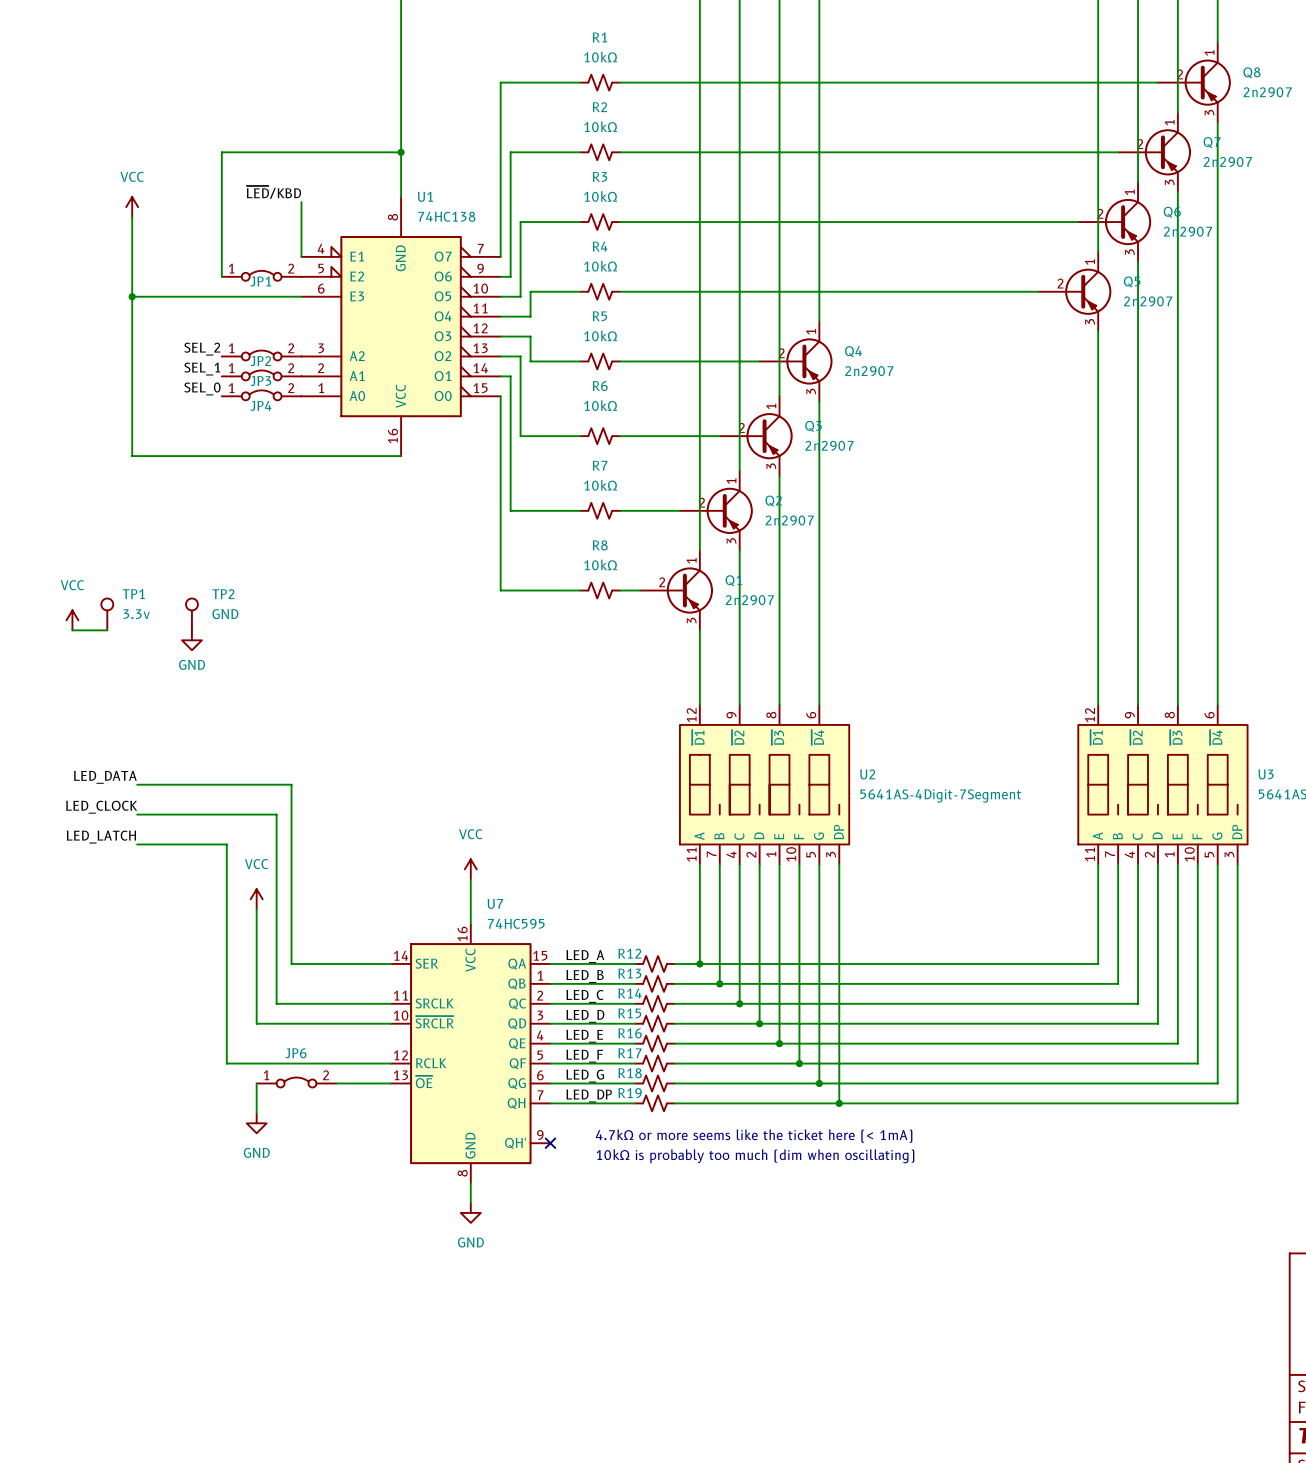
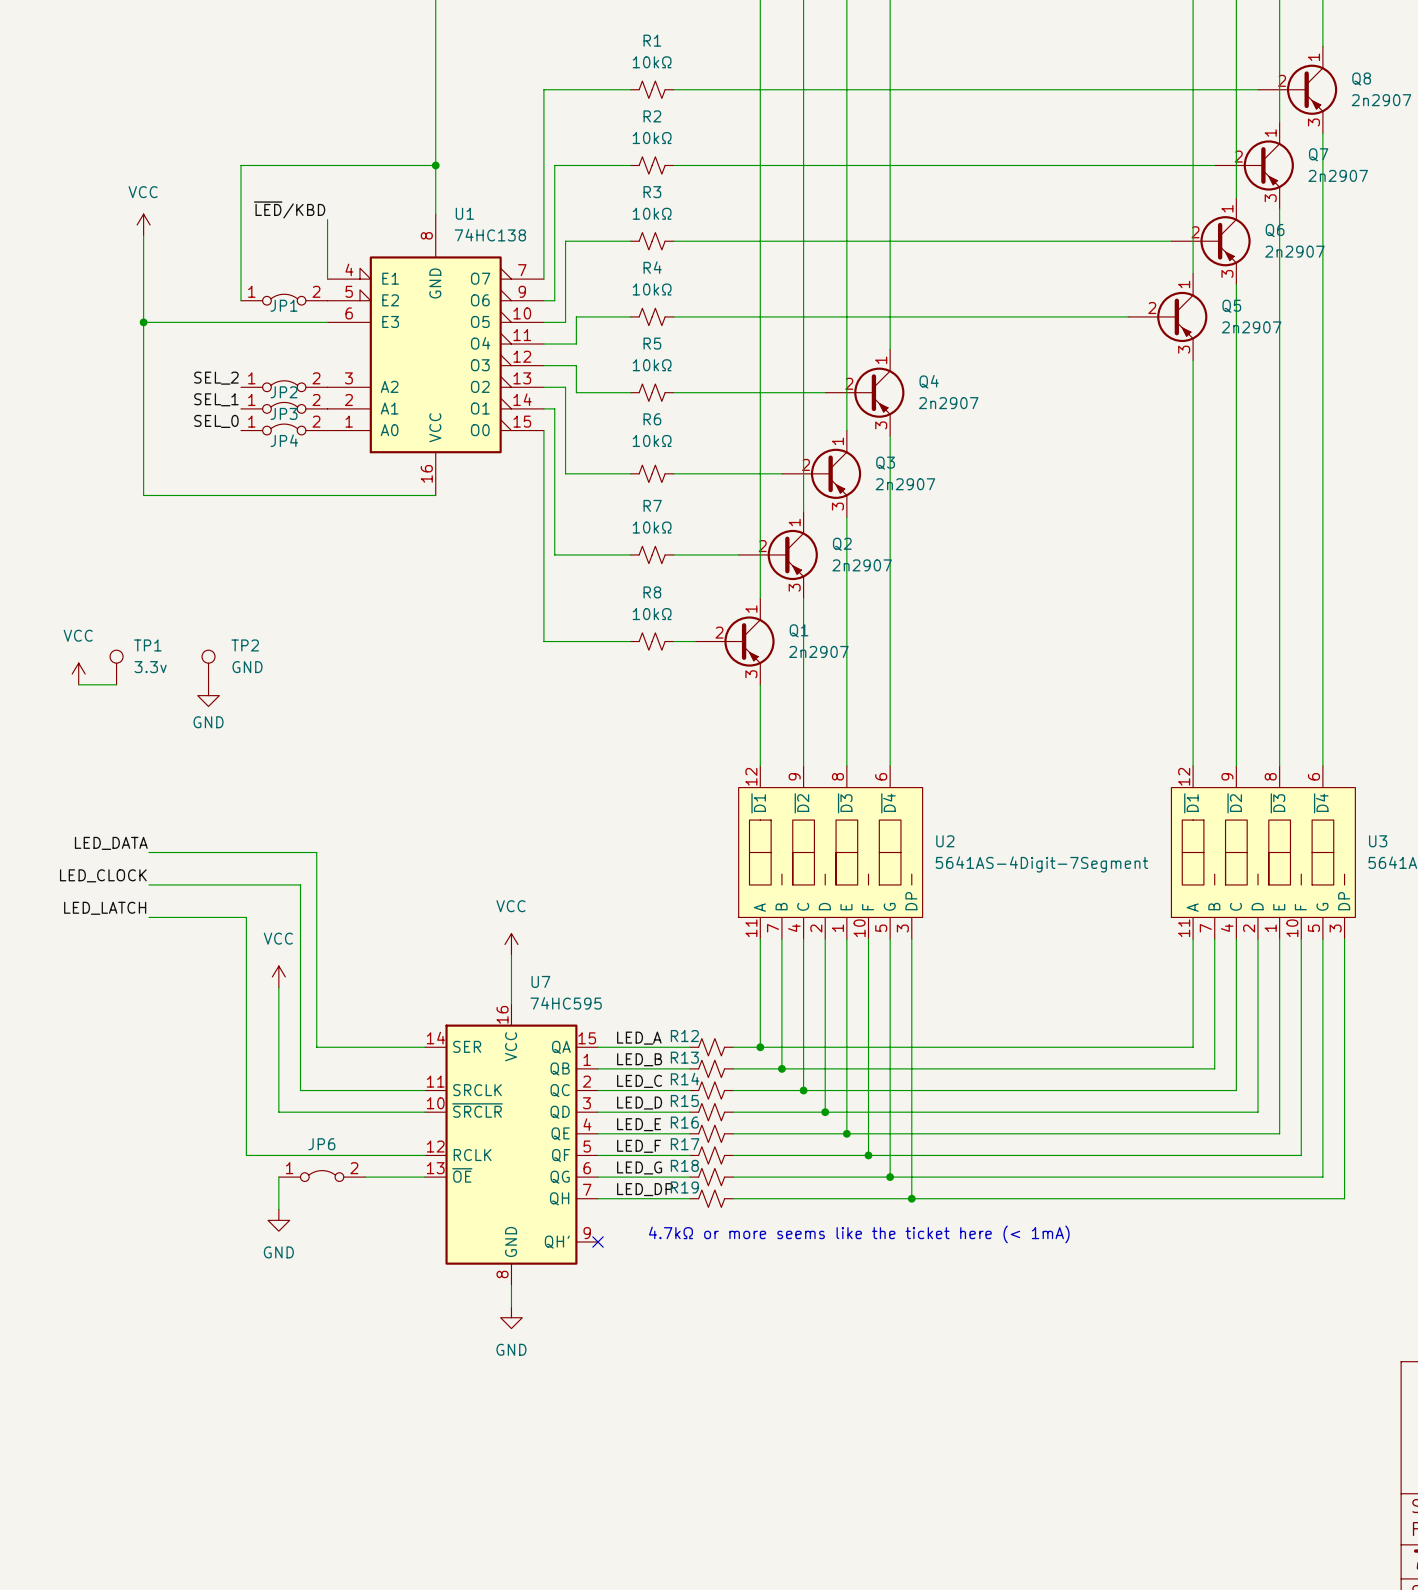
text: 10kΩ is probably too much (dim when oscillating) (755, 1156) -> none

